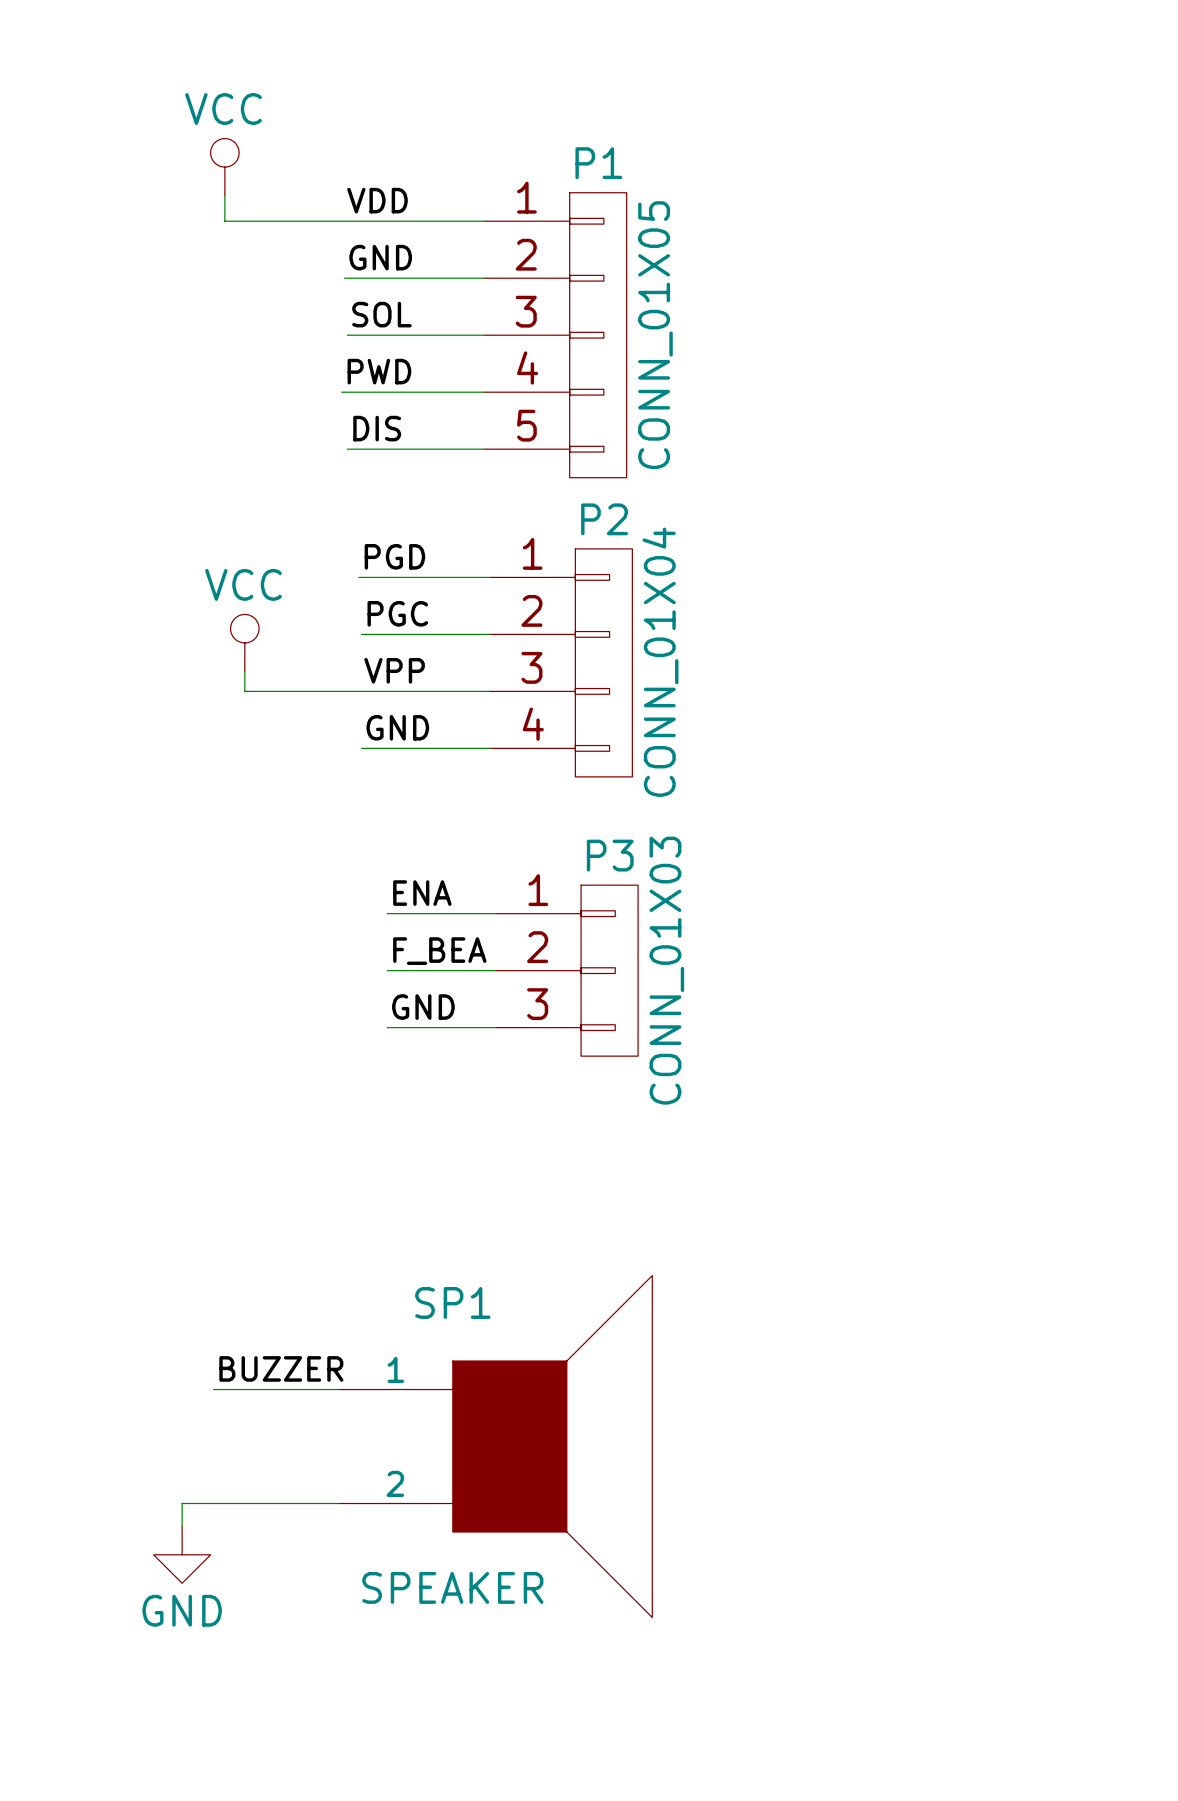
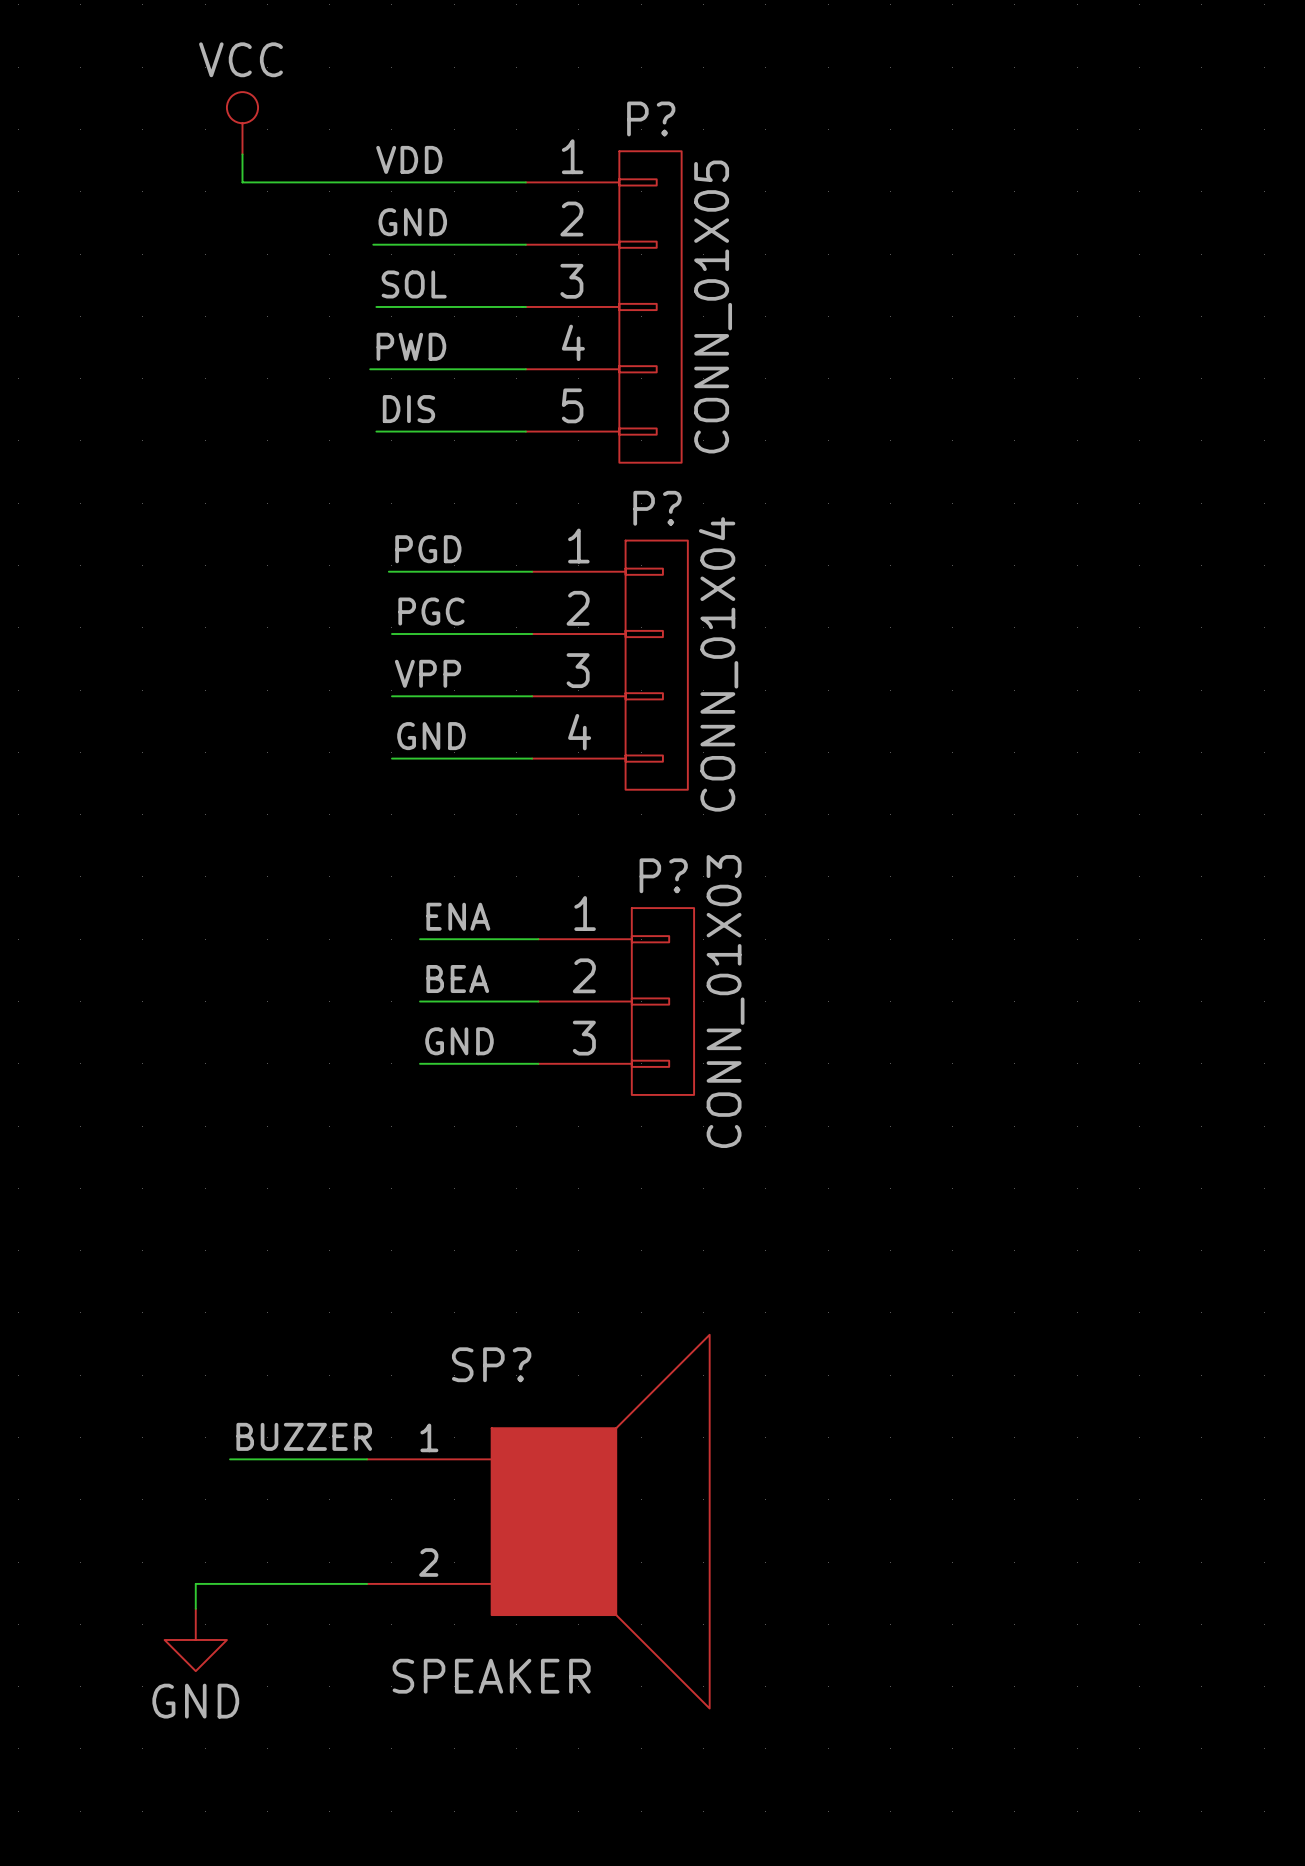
P1 name: P1 (598, 163) -> P? (651, 118)
P2 name: P2 (604, 519) -> P? (657, 508)
power symbol: VCC (244, 642) -> none
wire: (244, 671) (244, 691) (361, 691) -> none
P3 name: P3 (610, 855) -> P? (663, 875)
label: F_BEA (439, 951) -> BEA (457, 979)
SP1 name: SP1 (452, 1302) -> SP? (491, 1364)

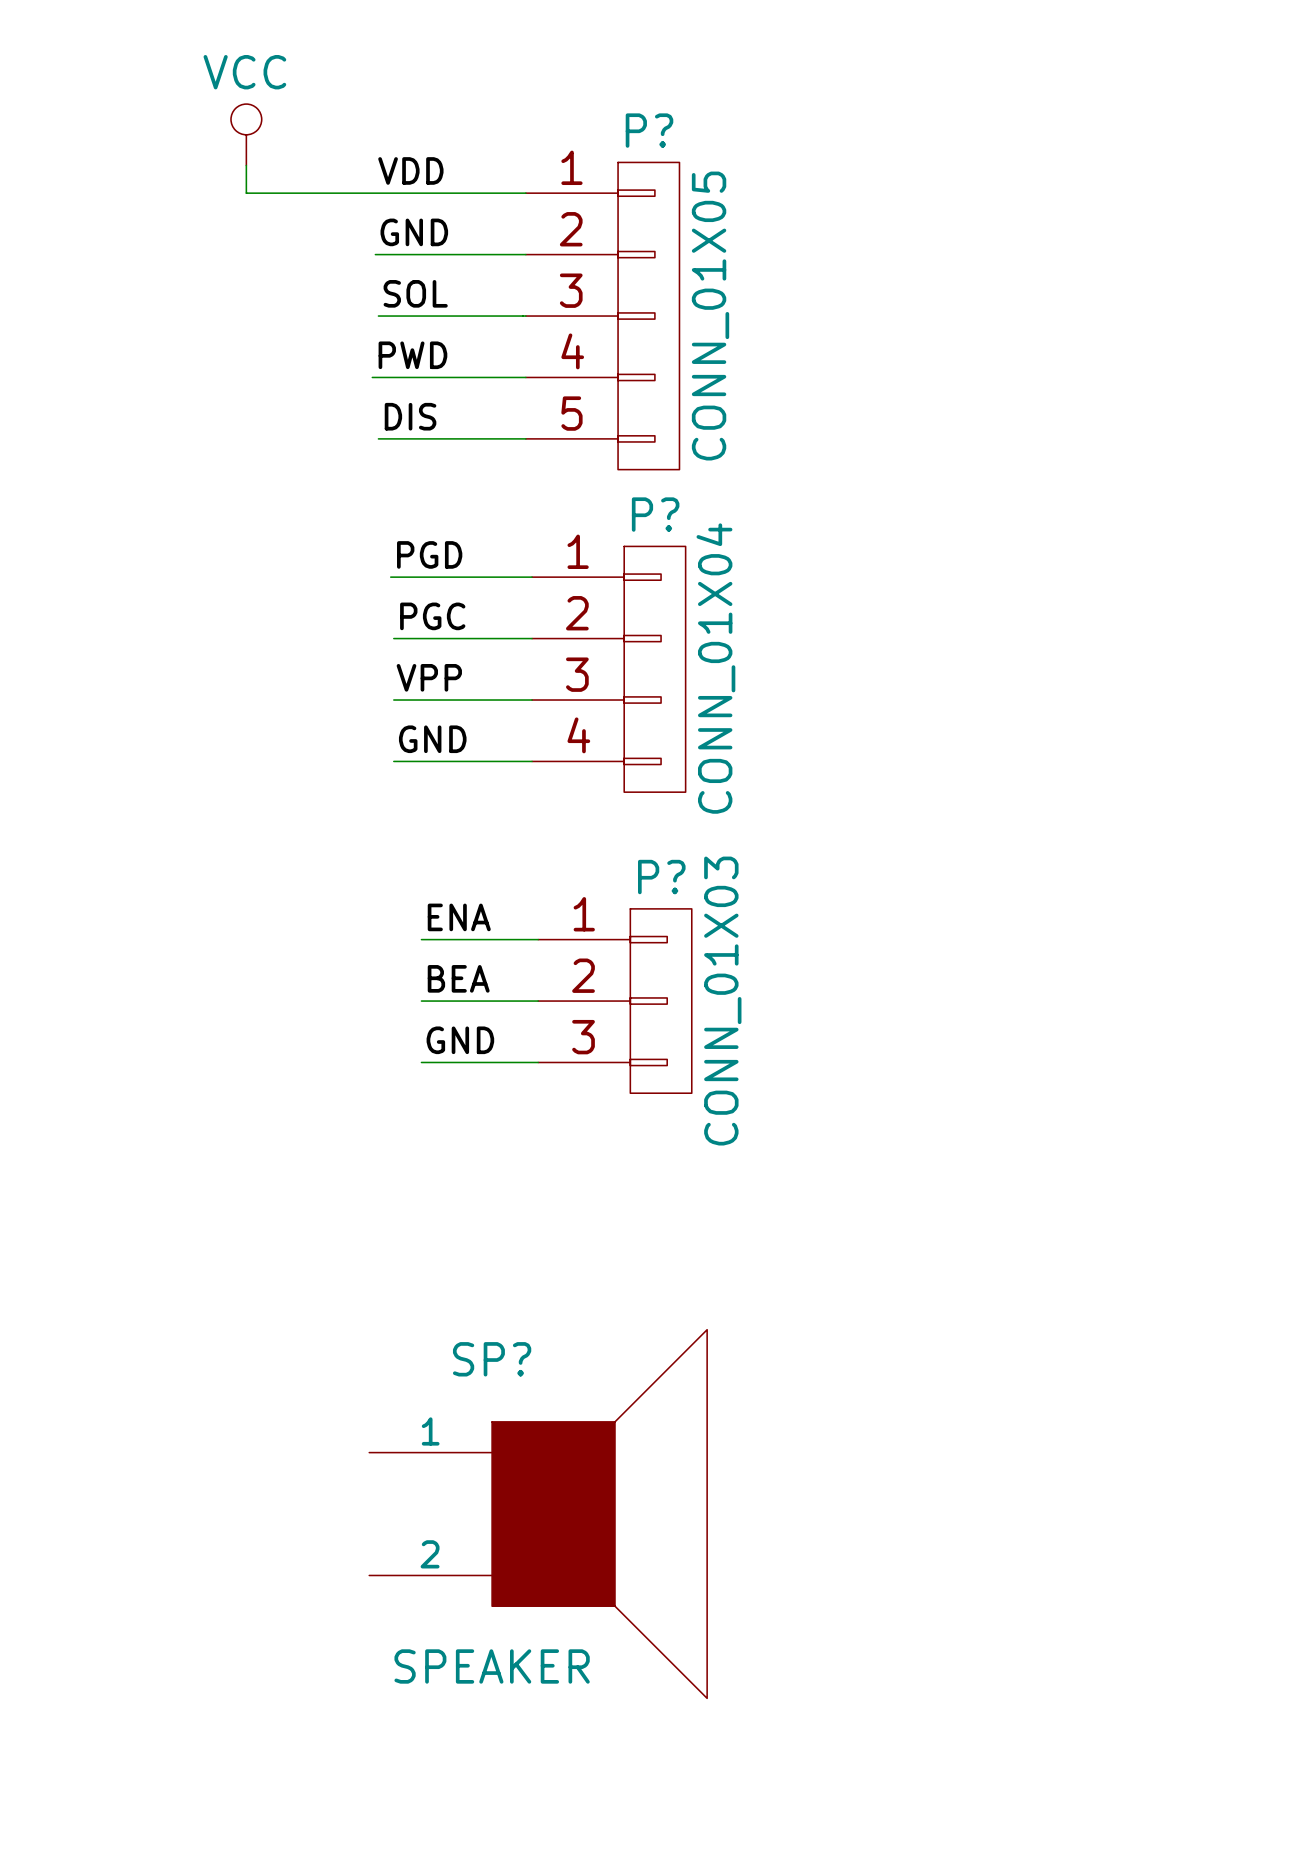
label: BUZZER (304, 1436) -> none
wire: (230, 1459) (367, 1459) -> none
wire: (367, 1583) (195, 1583) (195, 1608) -> none
power symbol: GND (195, 1639) -> none

